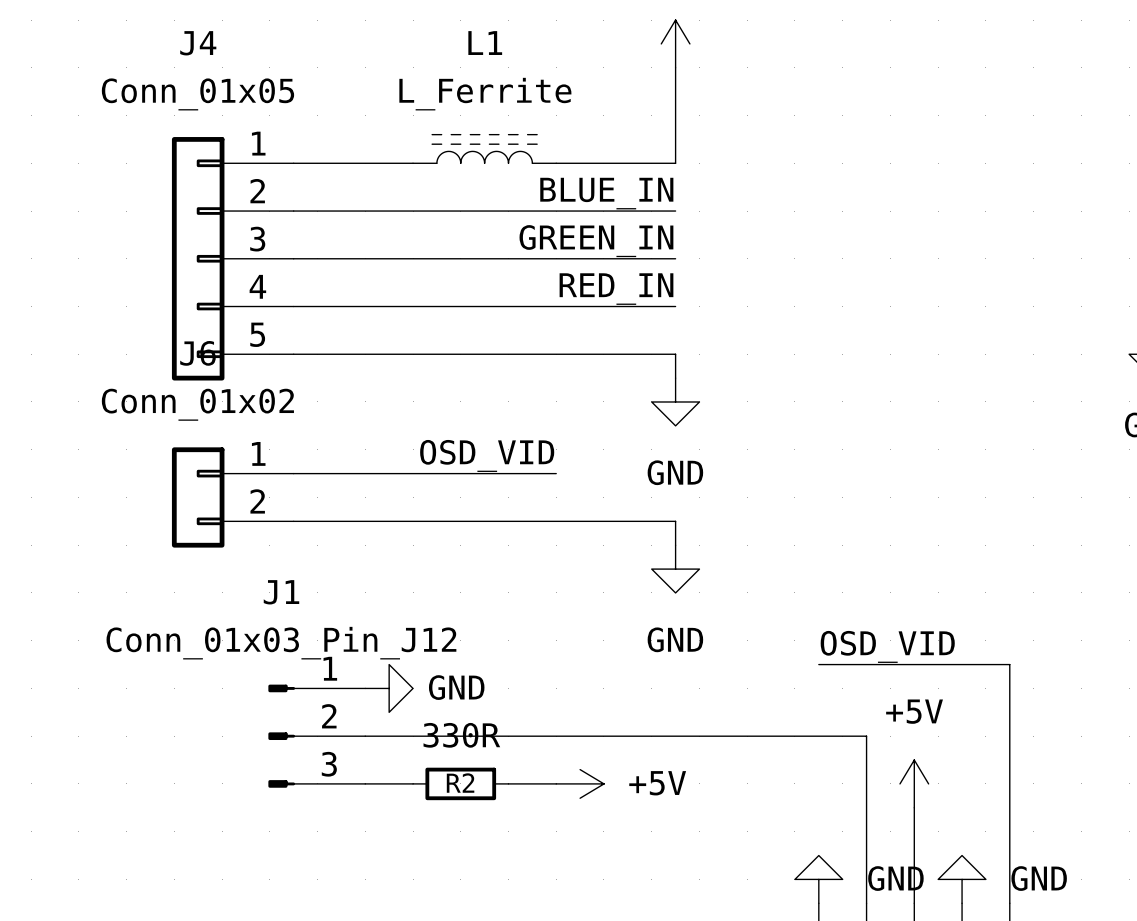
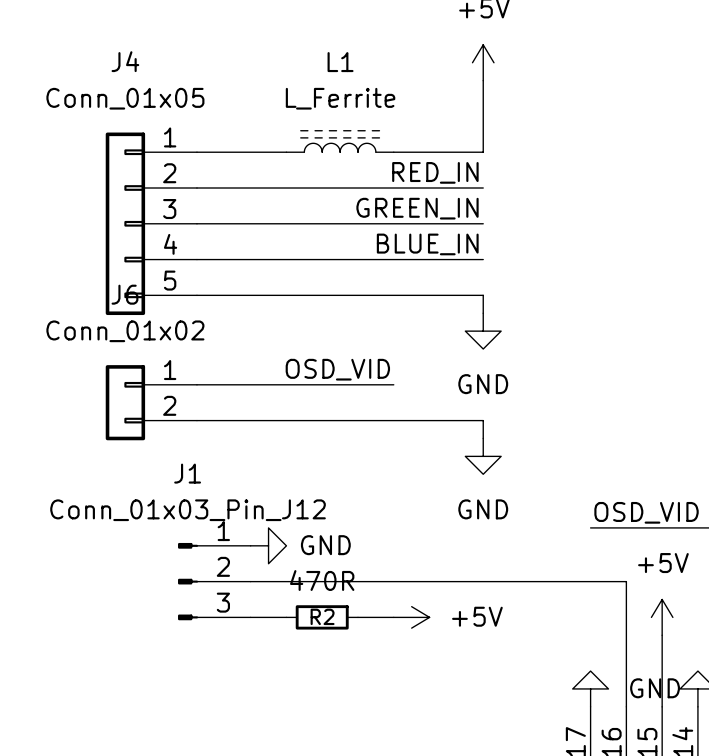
label: BLUE_IN (606, 193) -> RED_IN (435, 172)
label: RED_IN (616, 289) -> BLUE_IN (427, 244)
R2 value: 330R (461, 735) -> 470R (322, 580)

